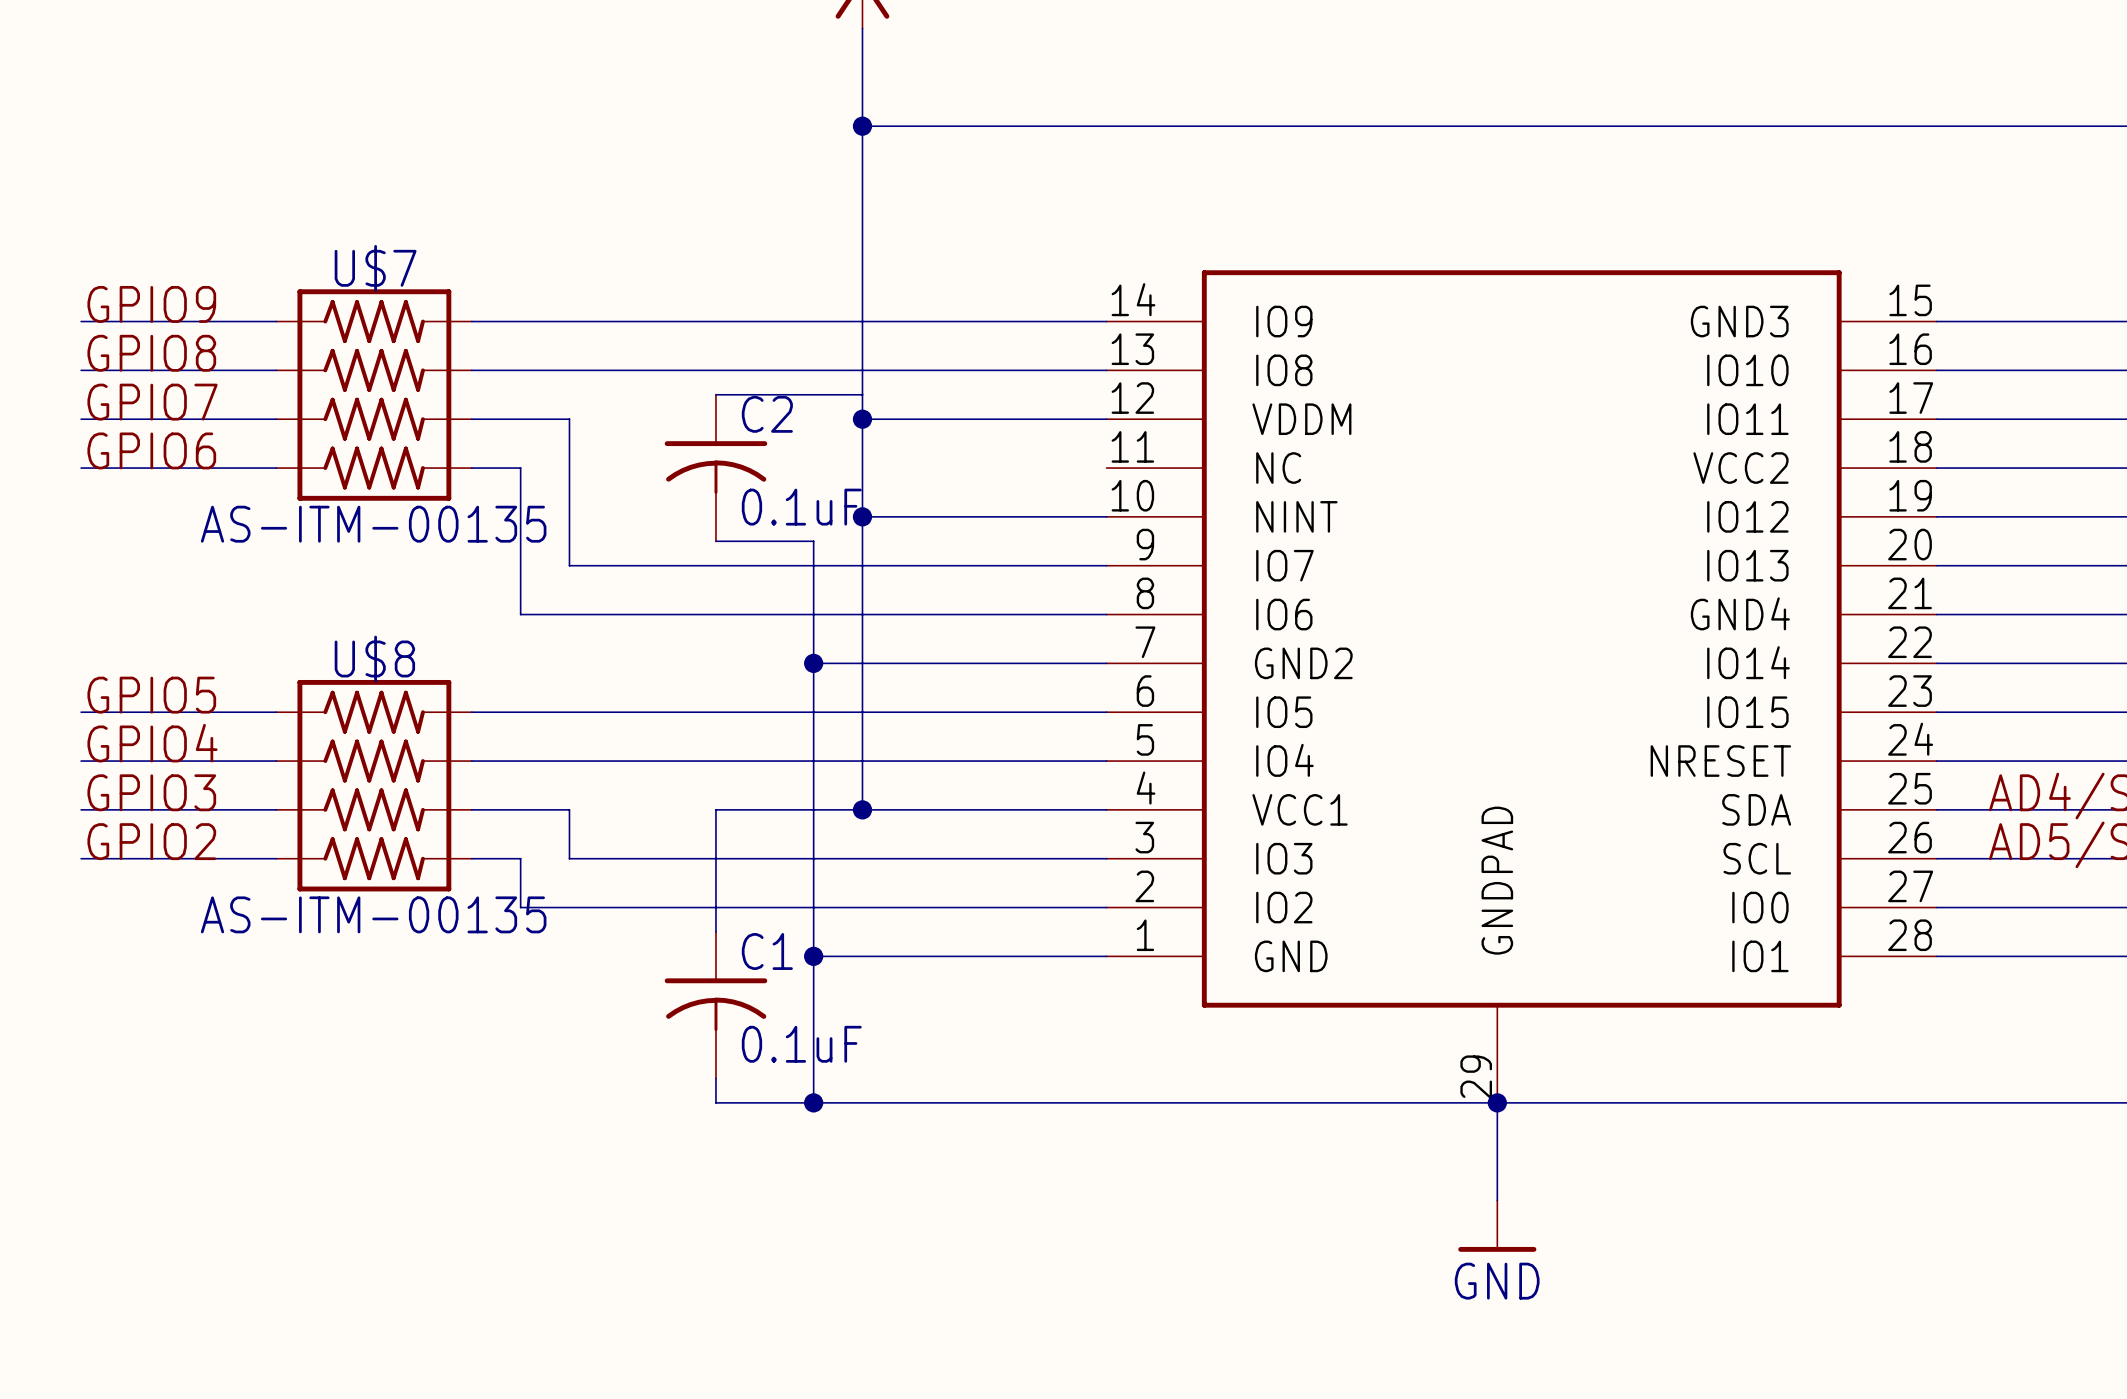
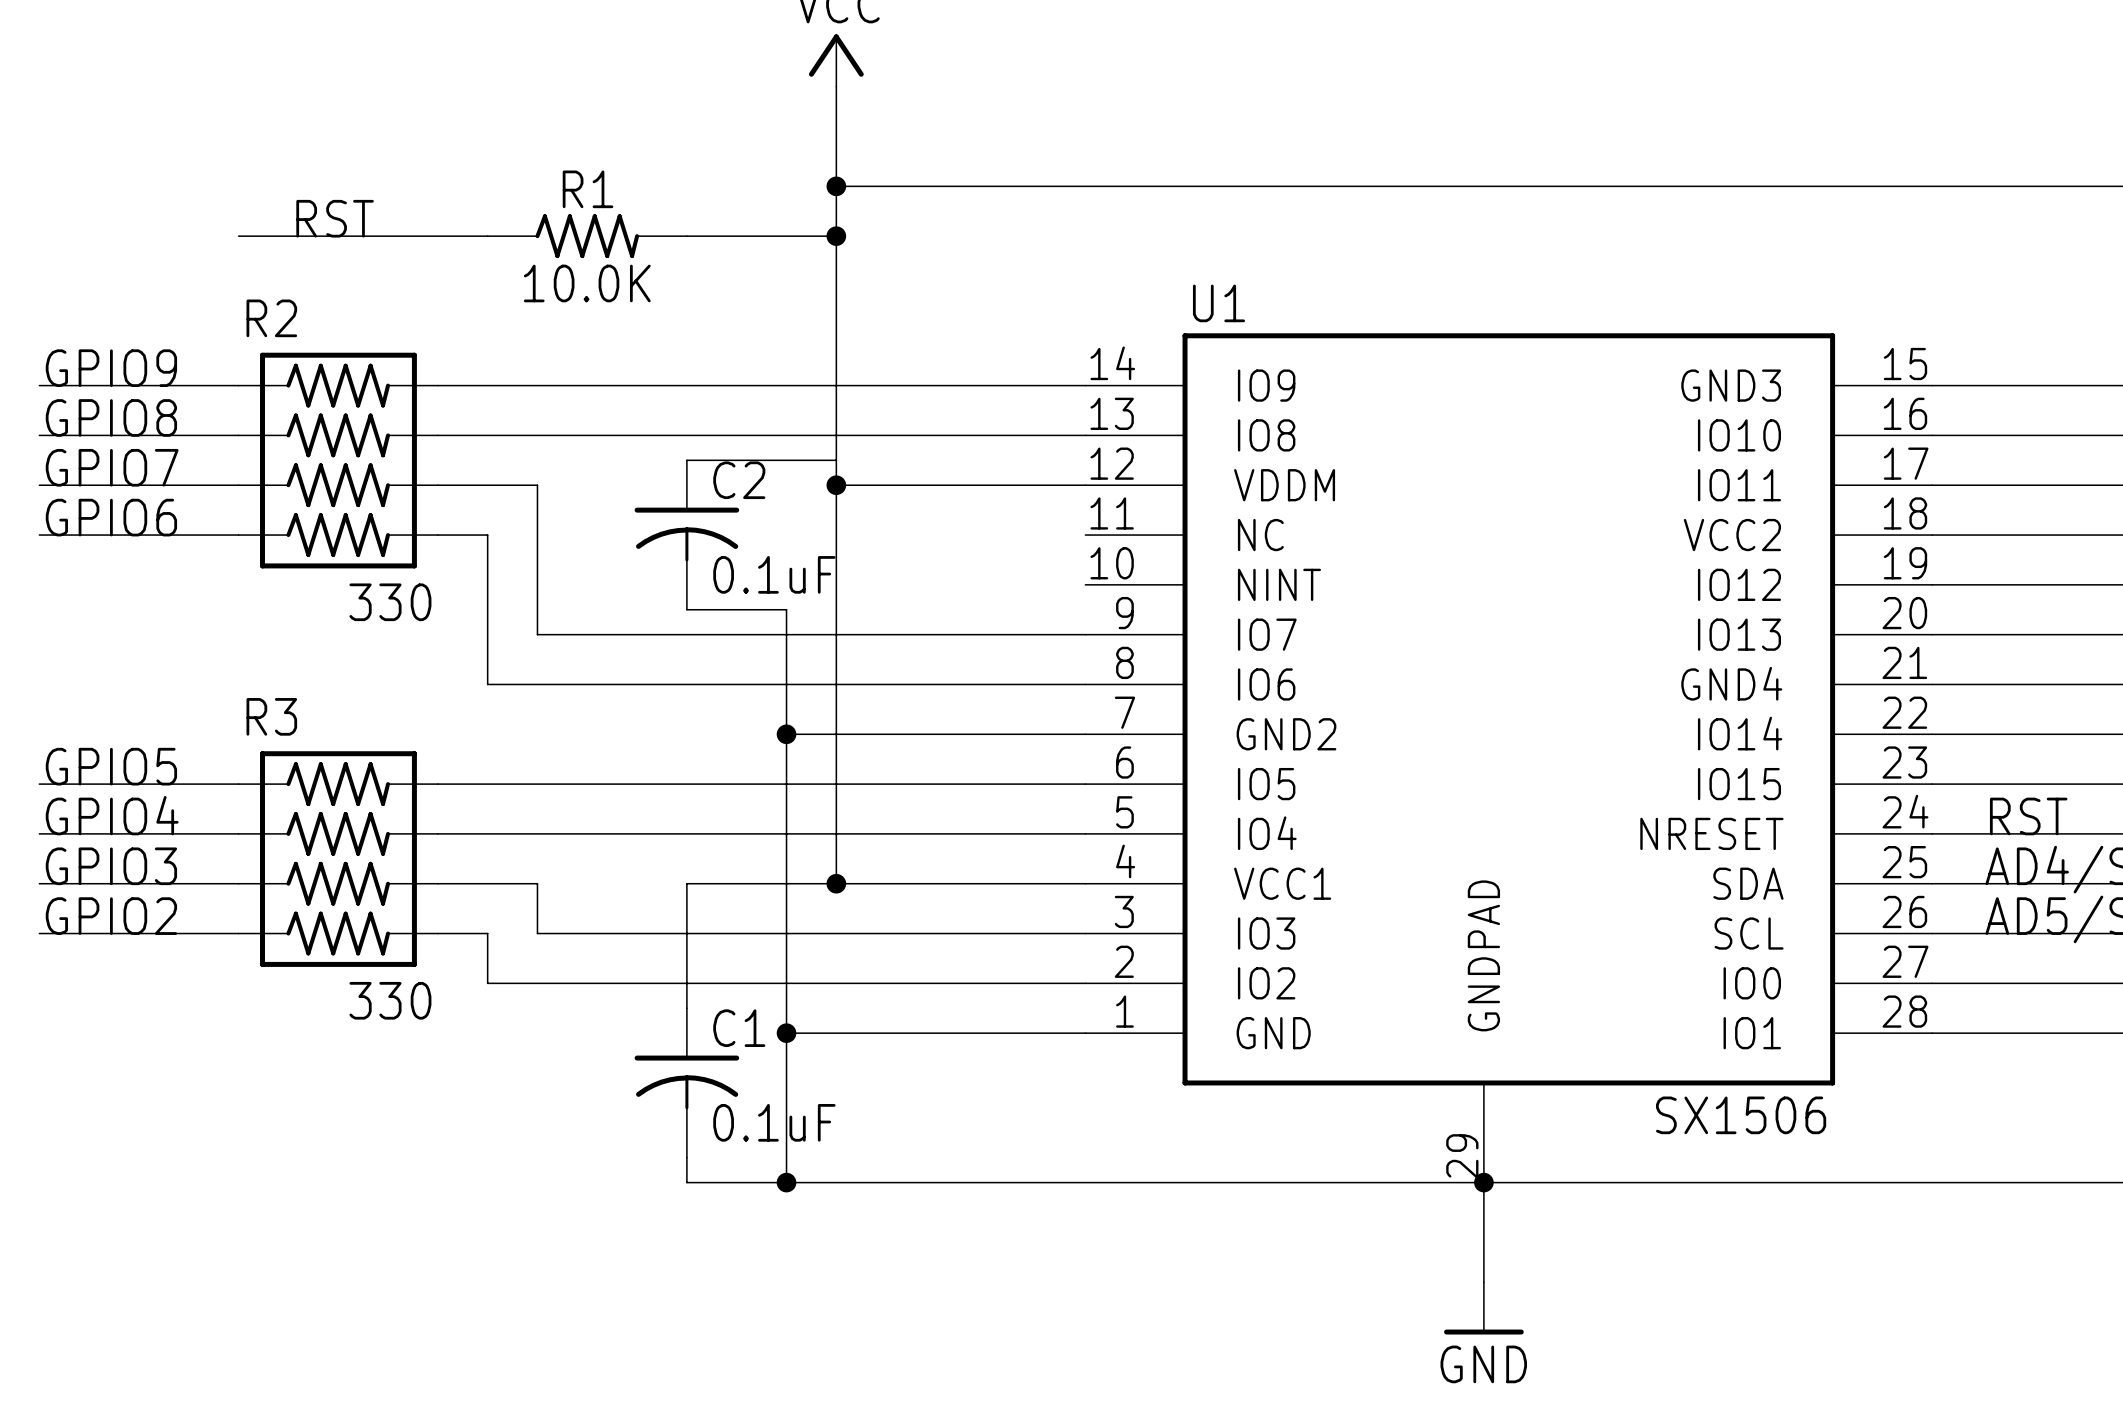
label: none -> RST (335, 218)
wire: none -> (238, 236) (487, 236)
R1: none -> 10.0K (587, 236)
wire: none -> (686, 236) (836, 236)
junction: none -> (836, 236)
U1 name: none -> U1 (1218, 303)
U$7 name: U$7 (375, 268) -> R2 (271, 318)
wire: (862, 516) (1106, 516) -> none
junction: (862, 516) -> none
U$7 value: AS-ITM-00135 (373, 524) -> 330 (390, 602)
U$8 name: U$8 (374, 658) -> R3 (271, 716)
label: none -> RST (2028, 816)
U$8 value: AS-ITM-00135 (373, 914) -> 330 (390, 1000)
U1 value: none -> SX1506 (1741, 1115)

